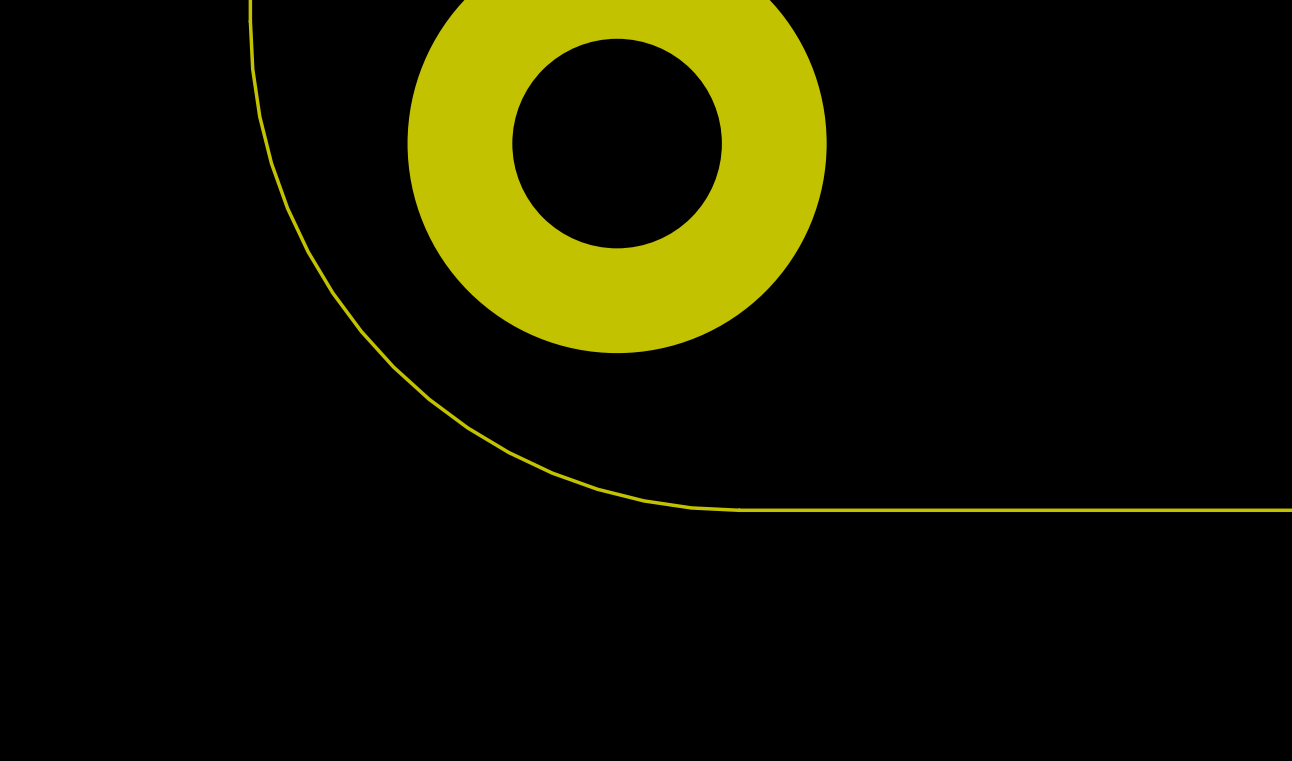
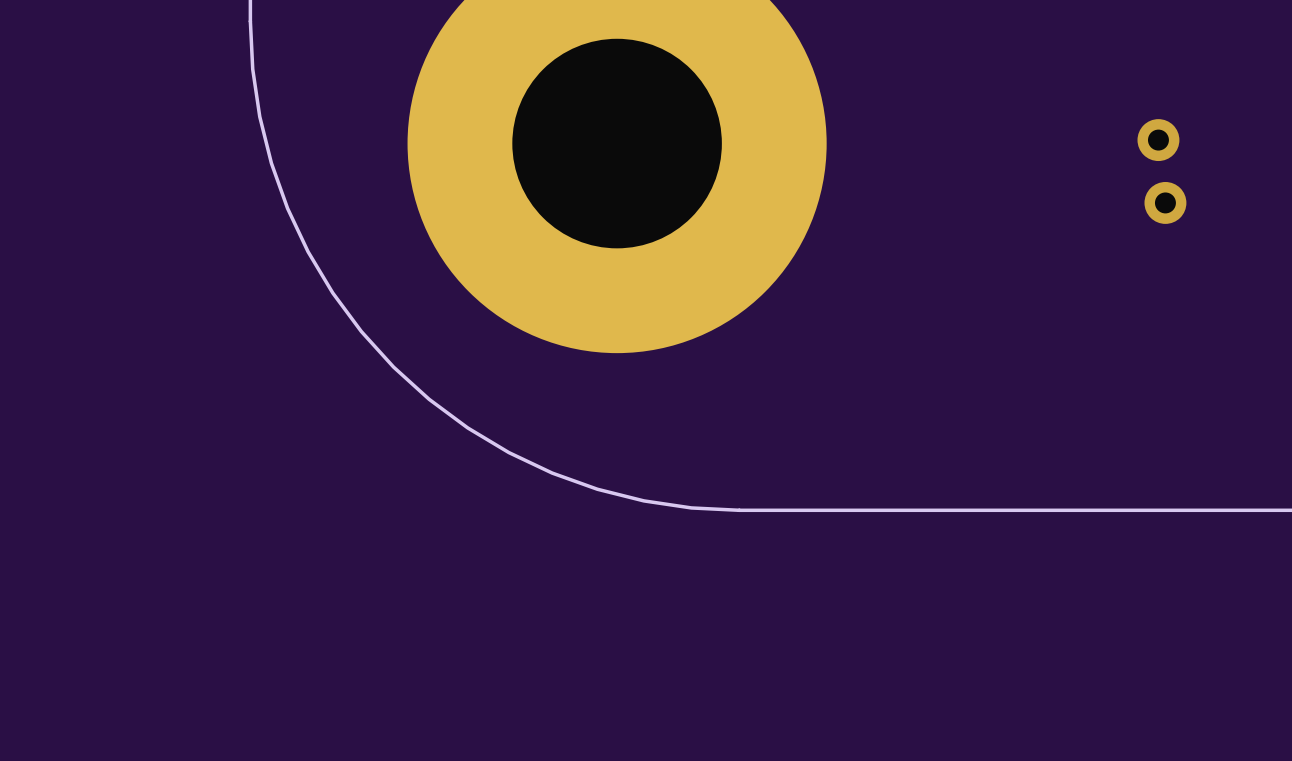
via: none -> (1158, 140)
via: none -> (1165, 202)

